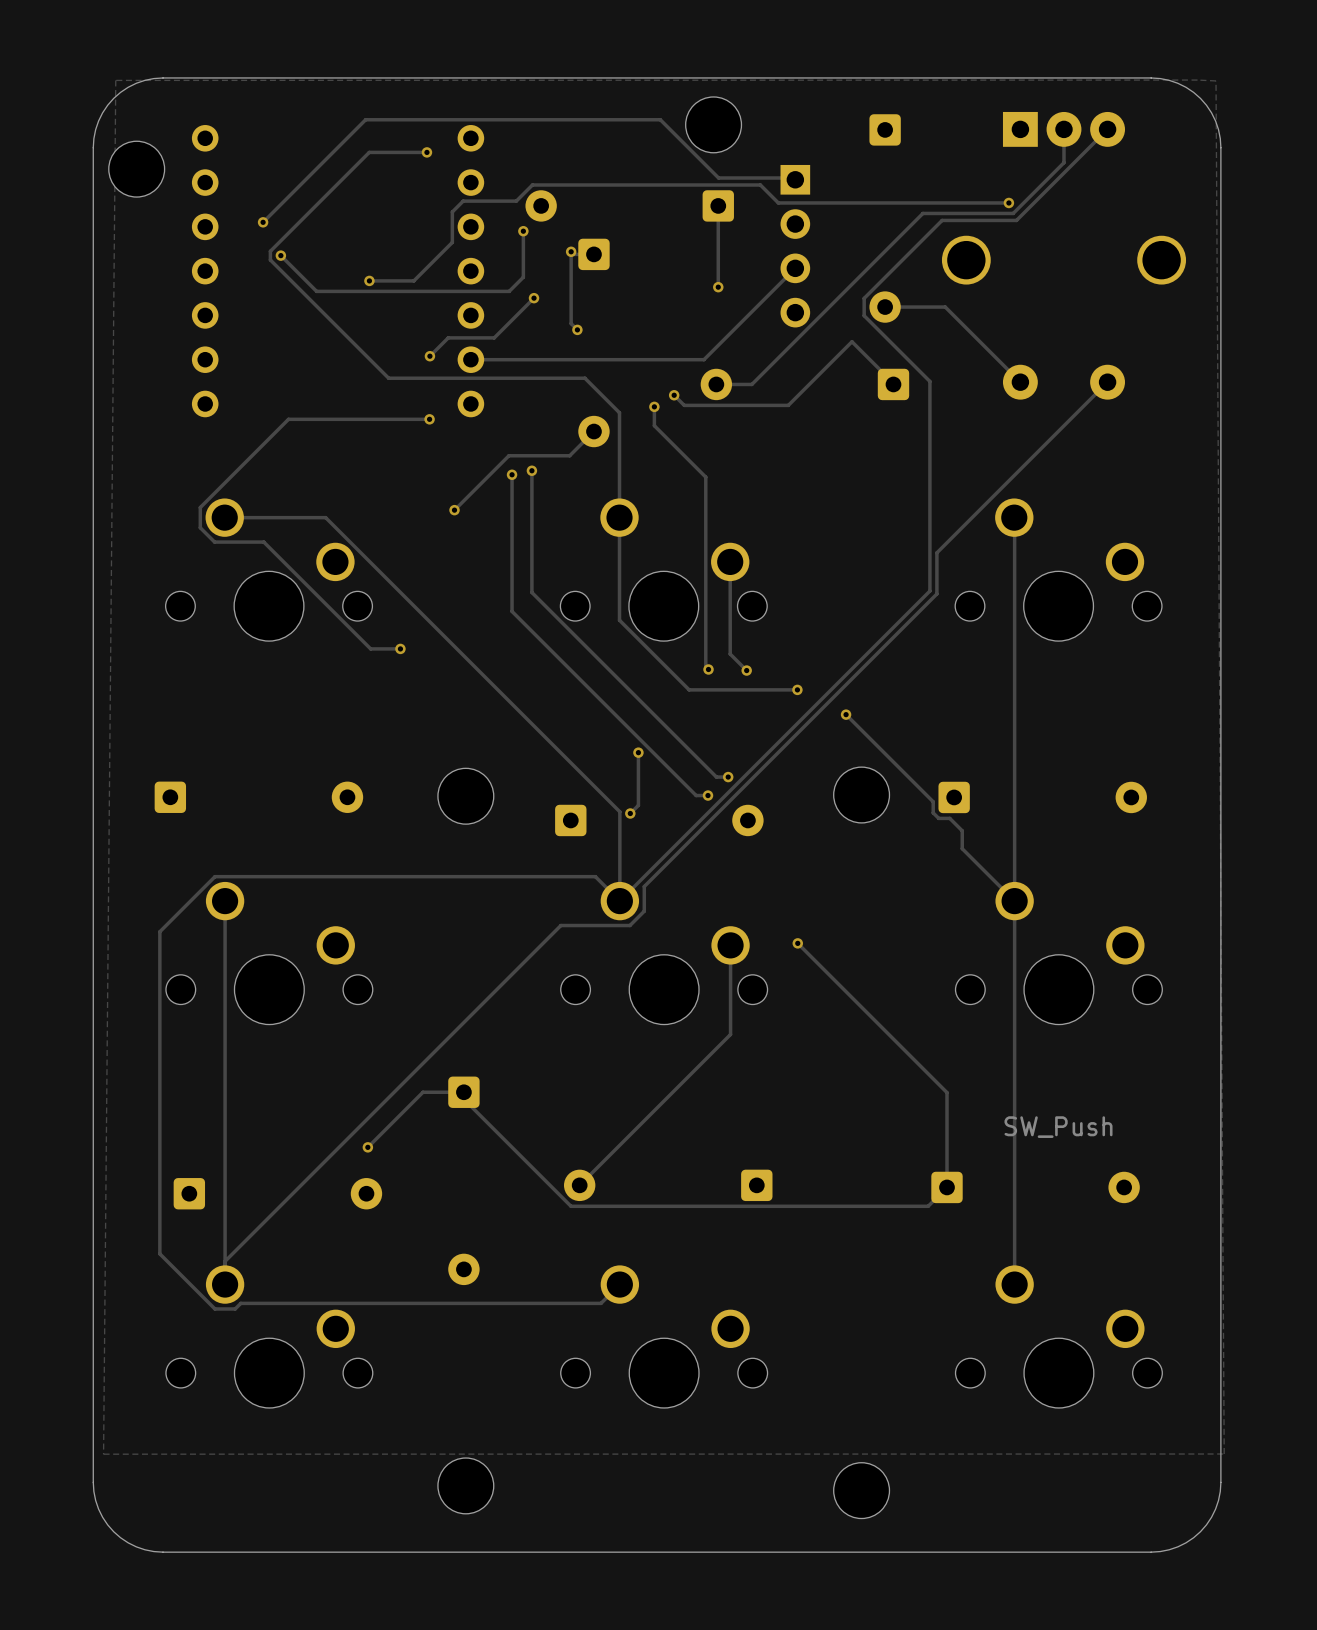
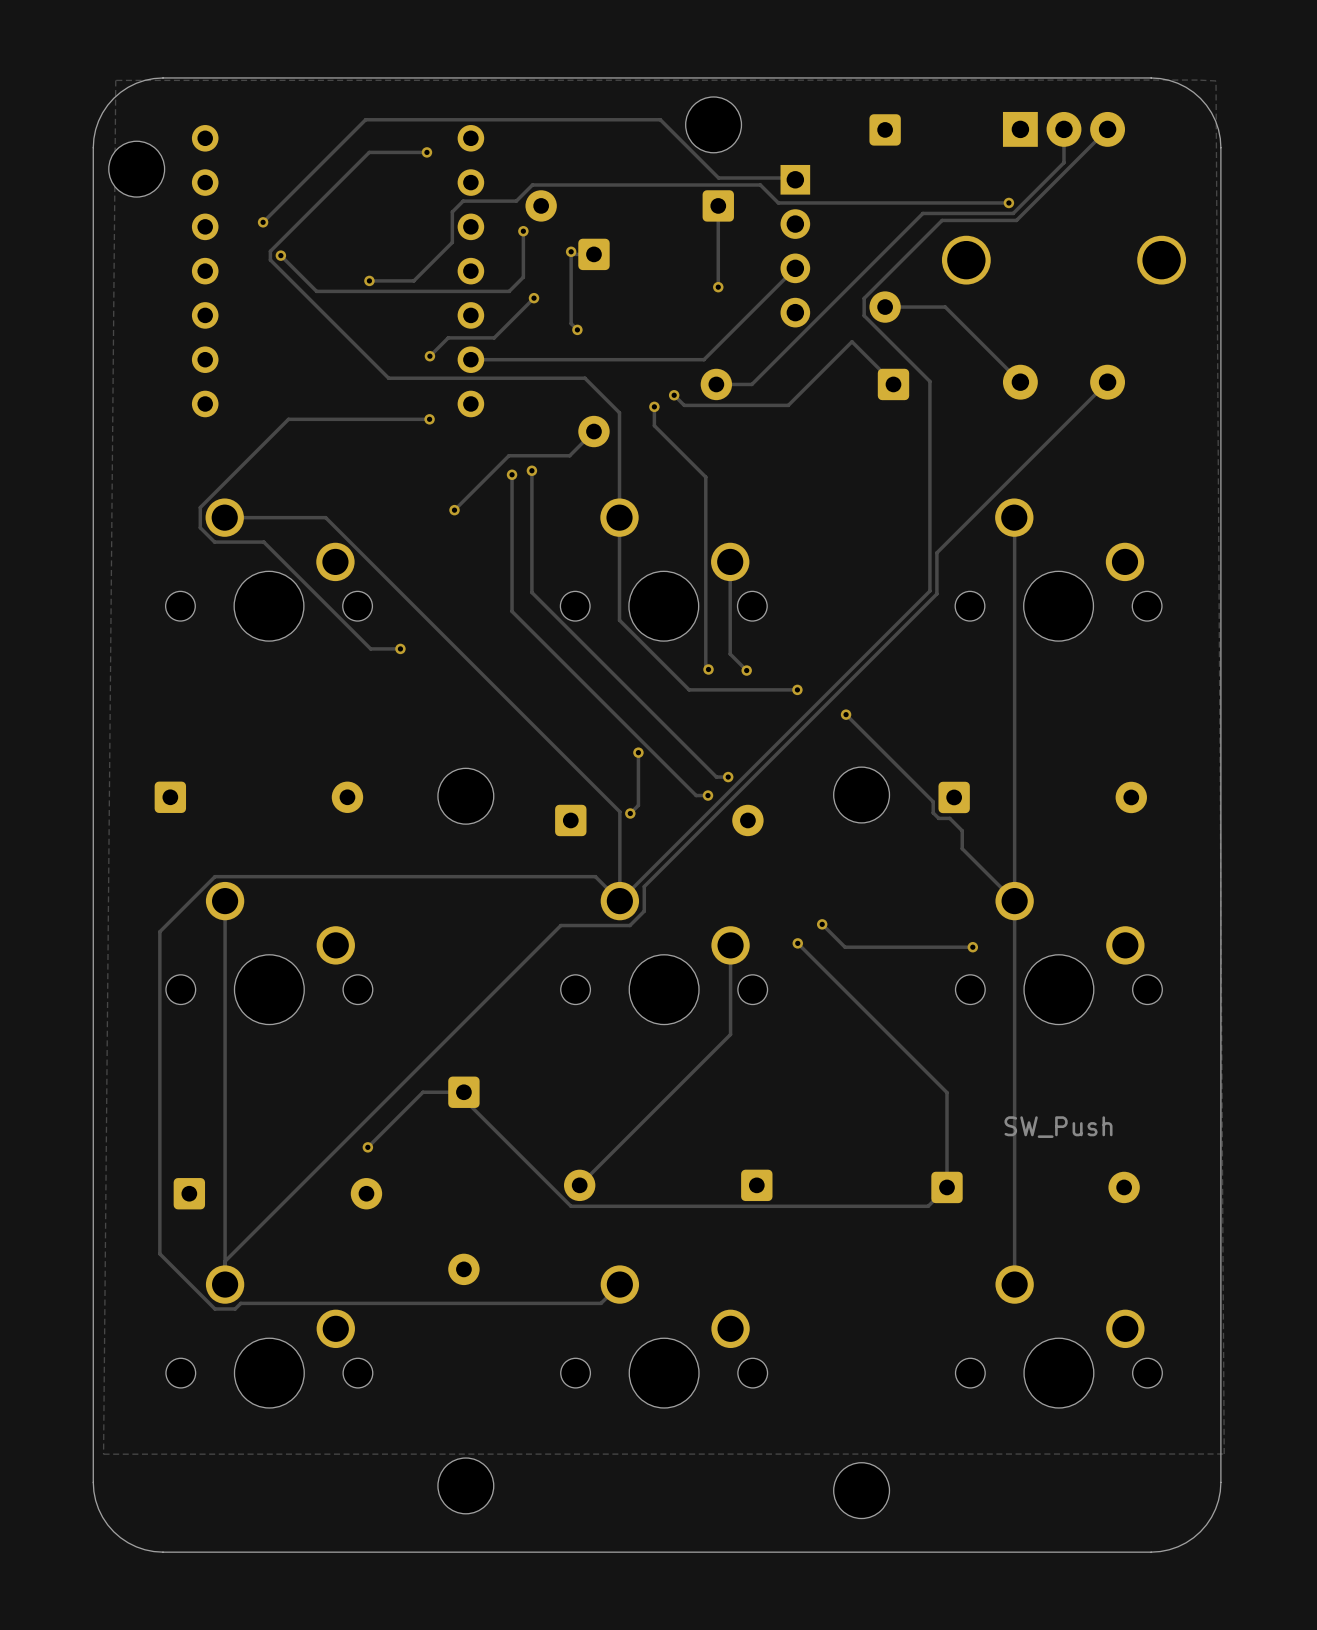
track: none -> (822, 924) (845, 947) (972, 947)
via: none -> (822, 924)
via: none -> (972, 947)

